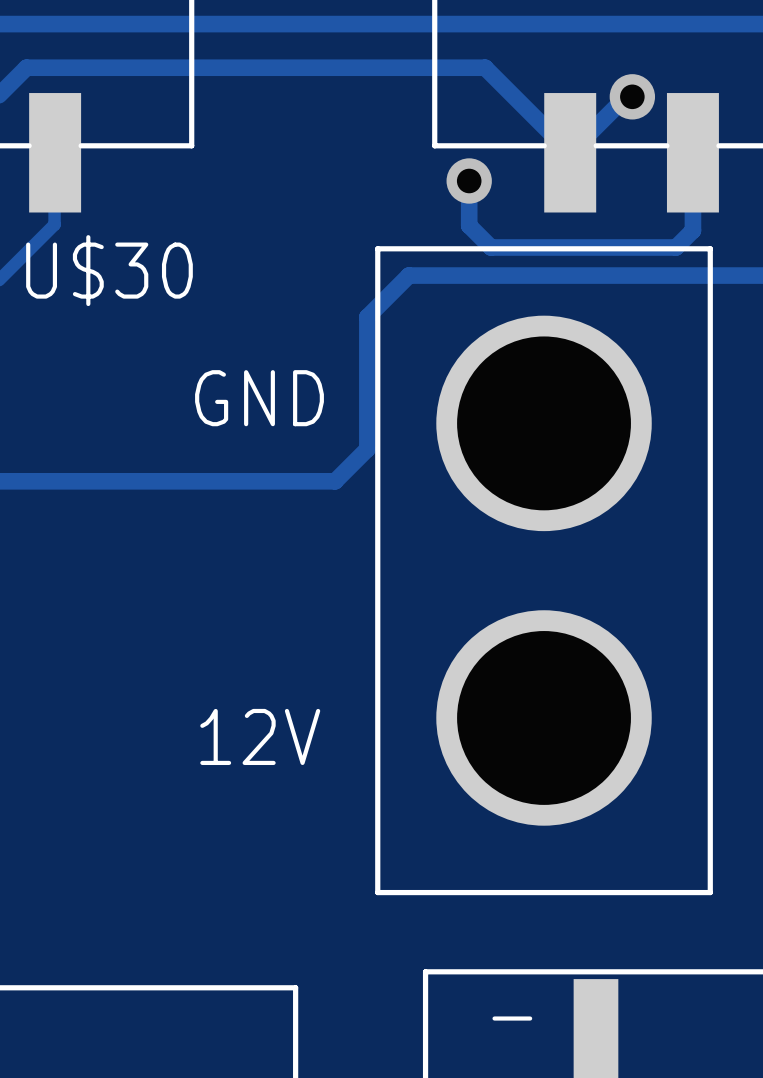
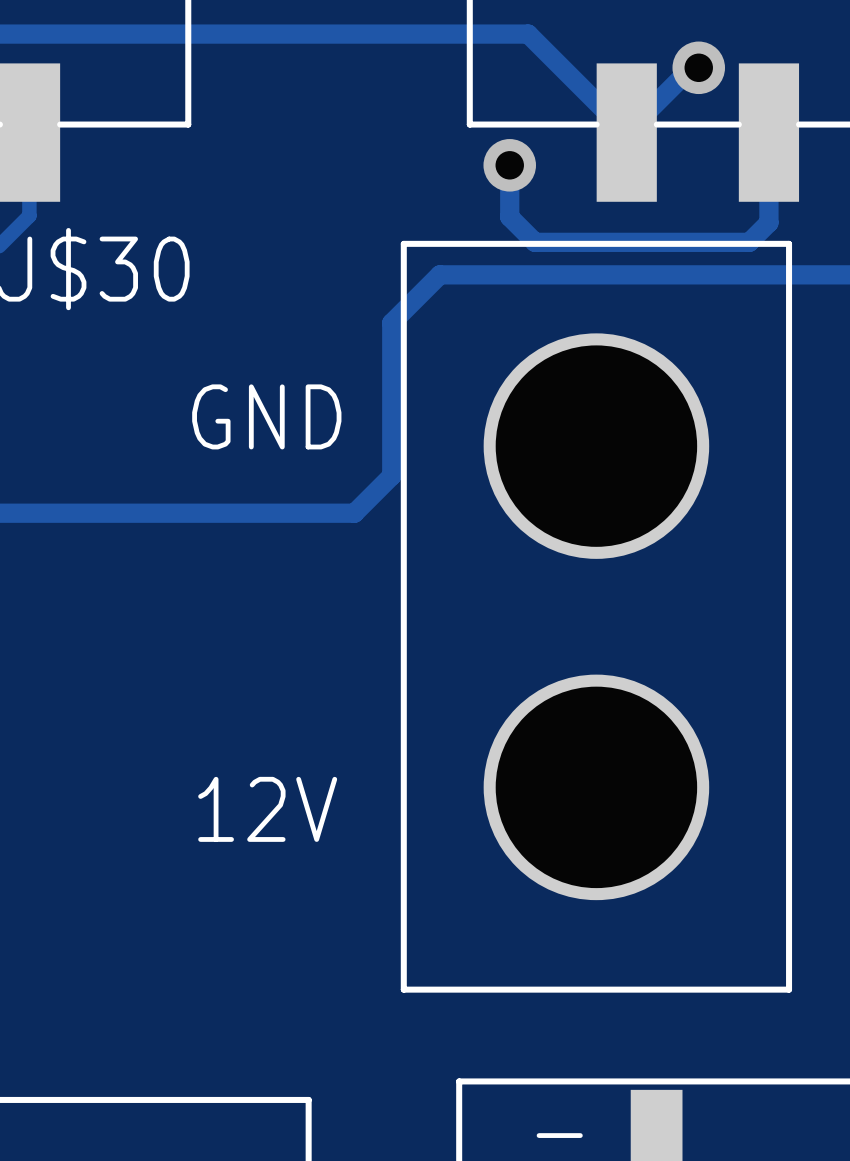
part footprint: [375, 246, 713, 896] -> [400, 240, 793, 993]

